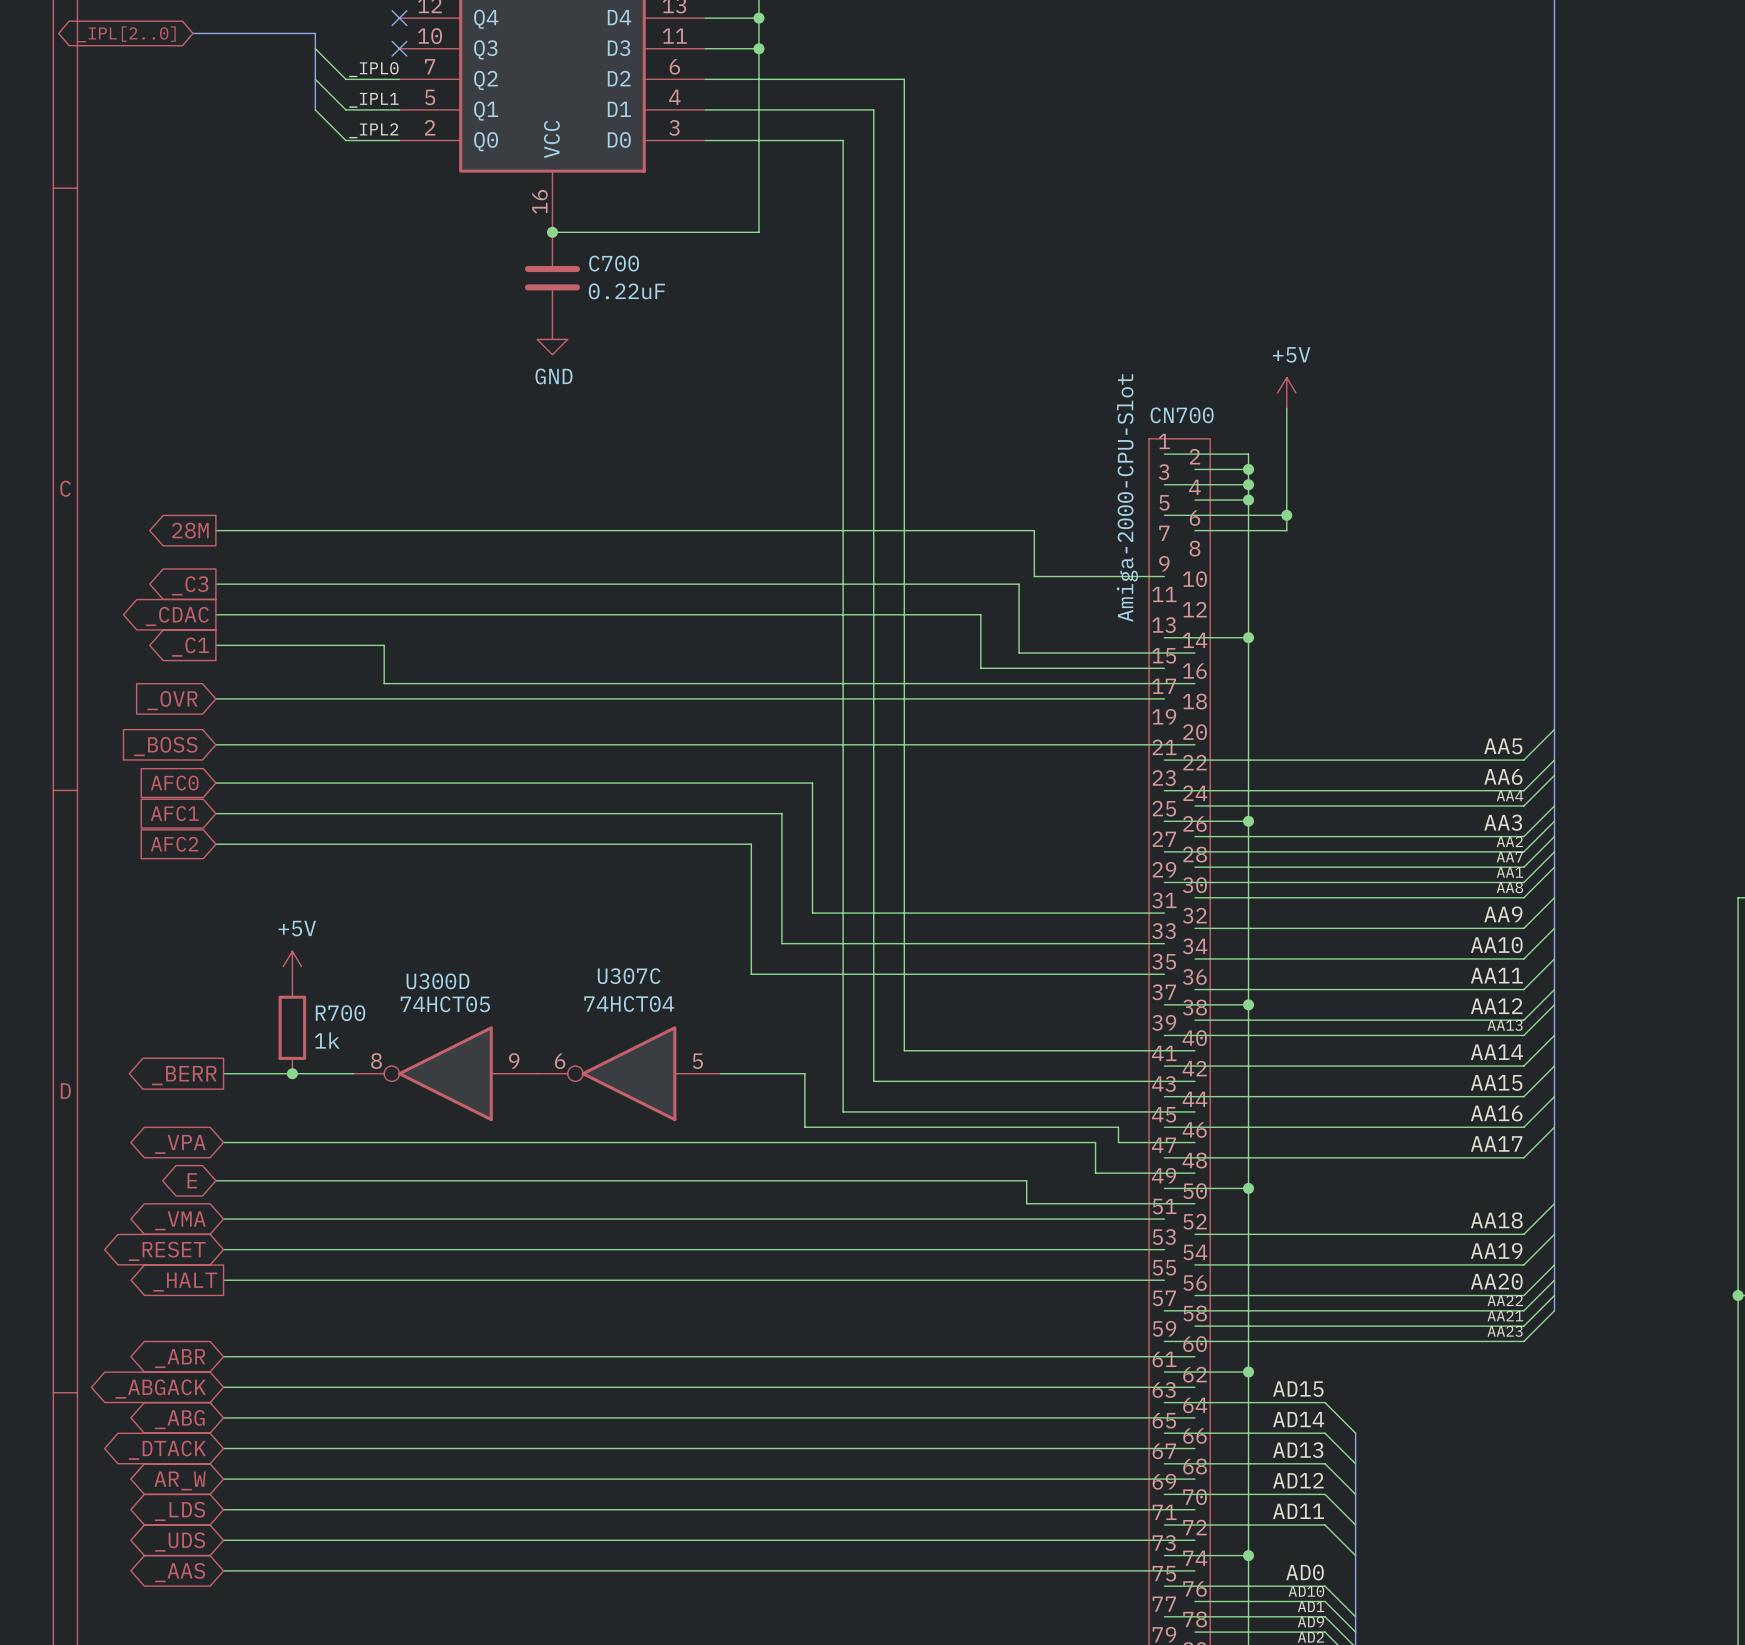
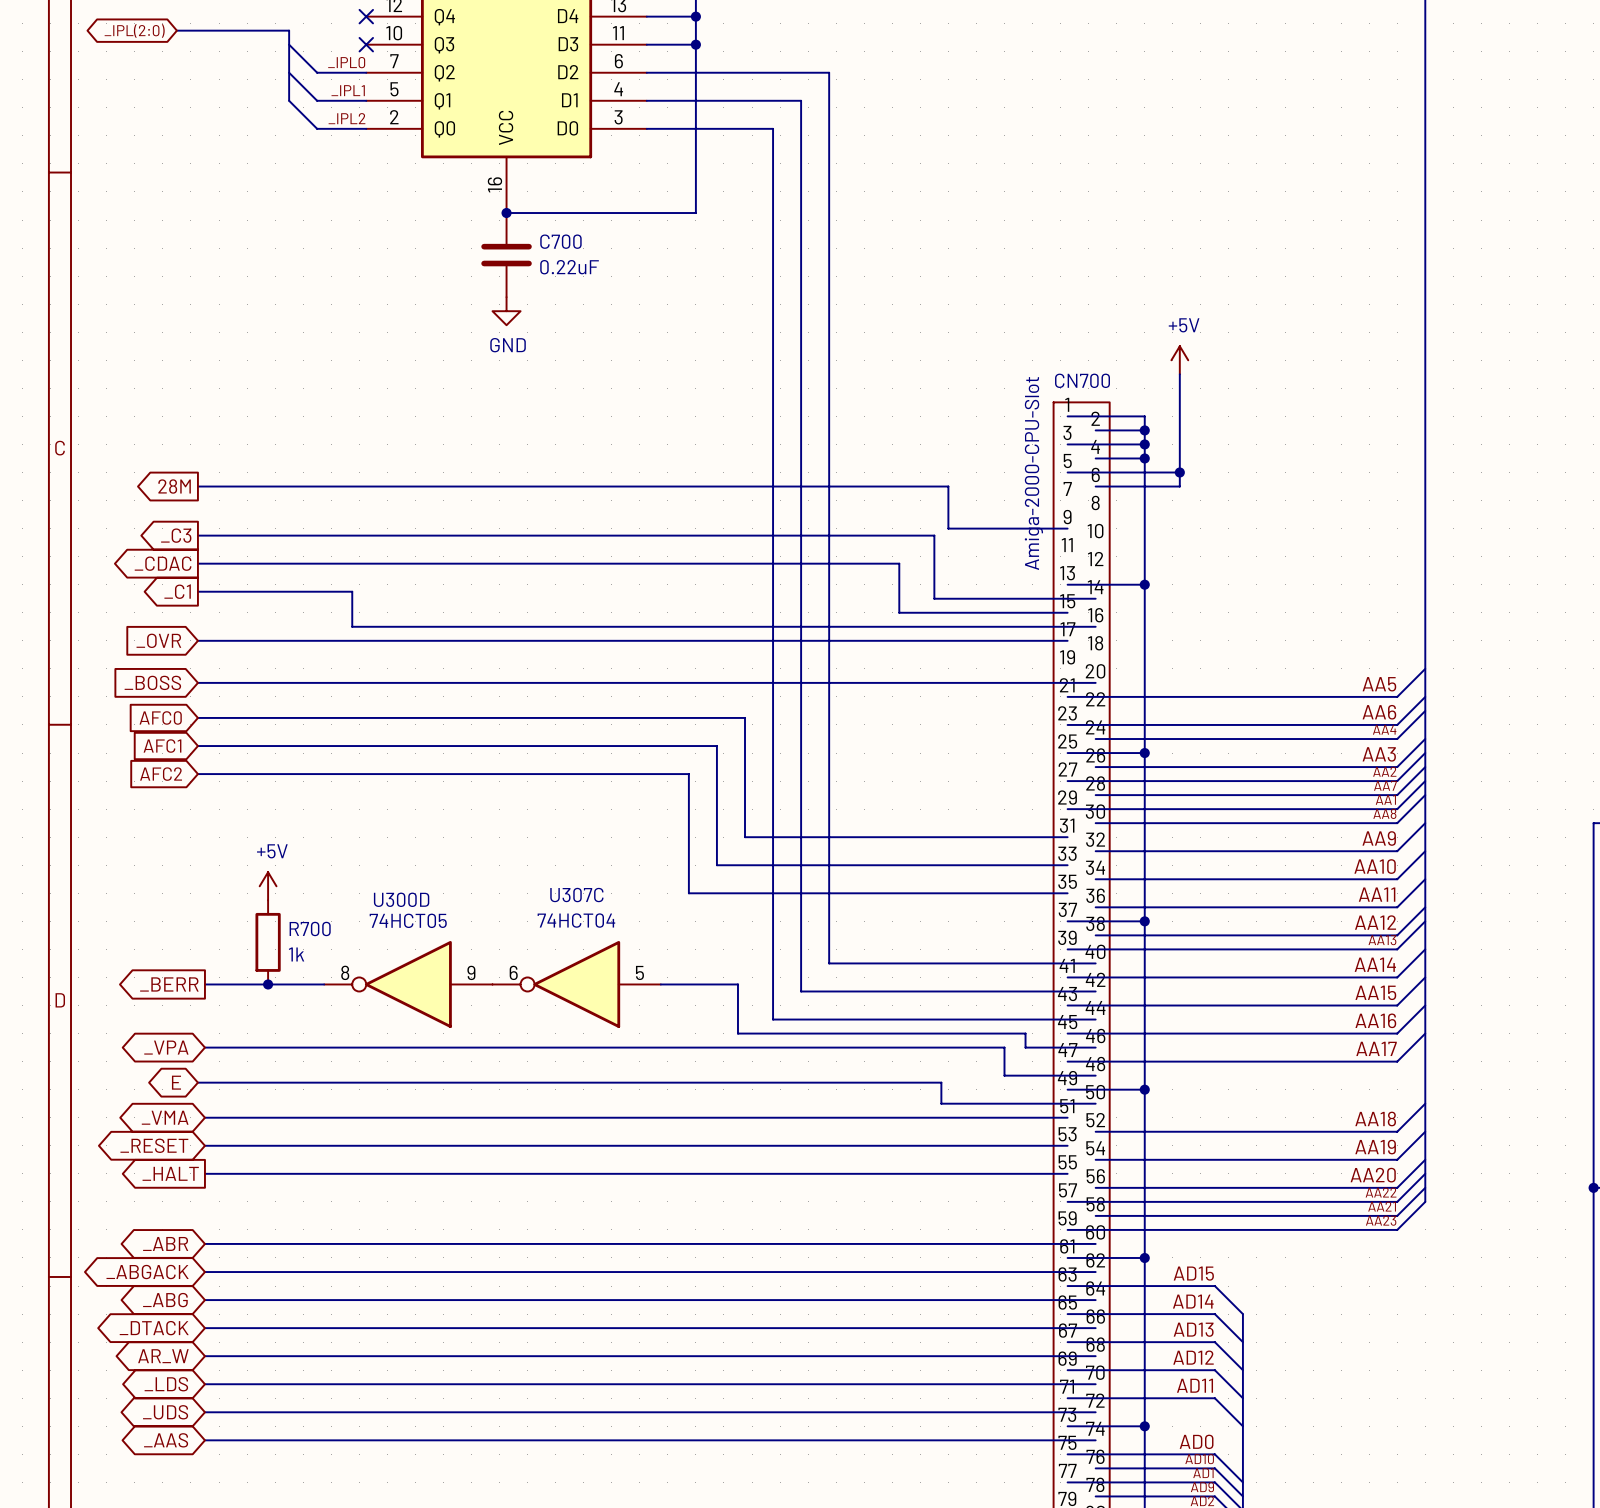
global label: _IPL[2..0] (126, 34) -> _IPL(2:0) (134, 30)

